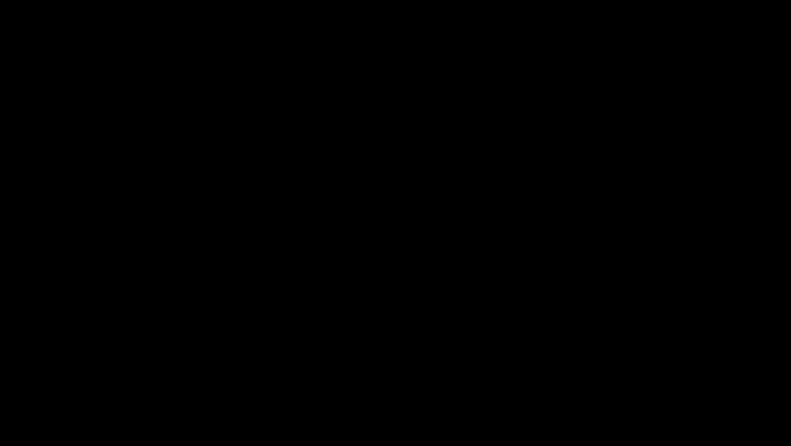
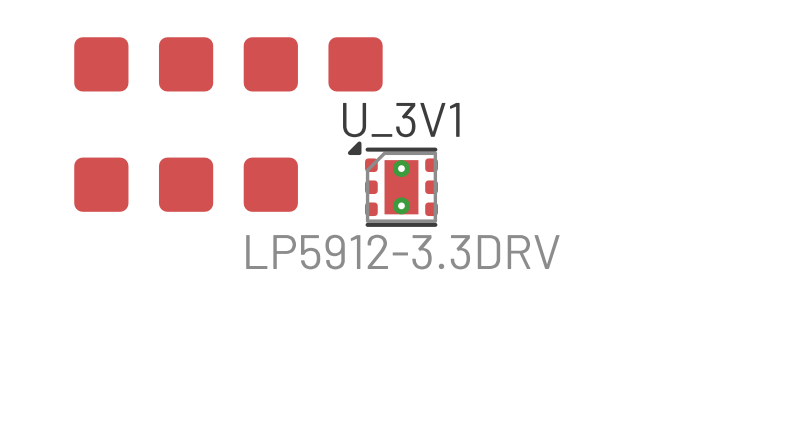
part: none -> (228, 64)
part: none -> (186, 184)
U_3V1: none -> LP5912-3.3DRV (392, 184)

